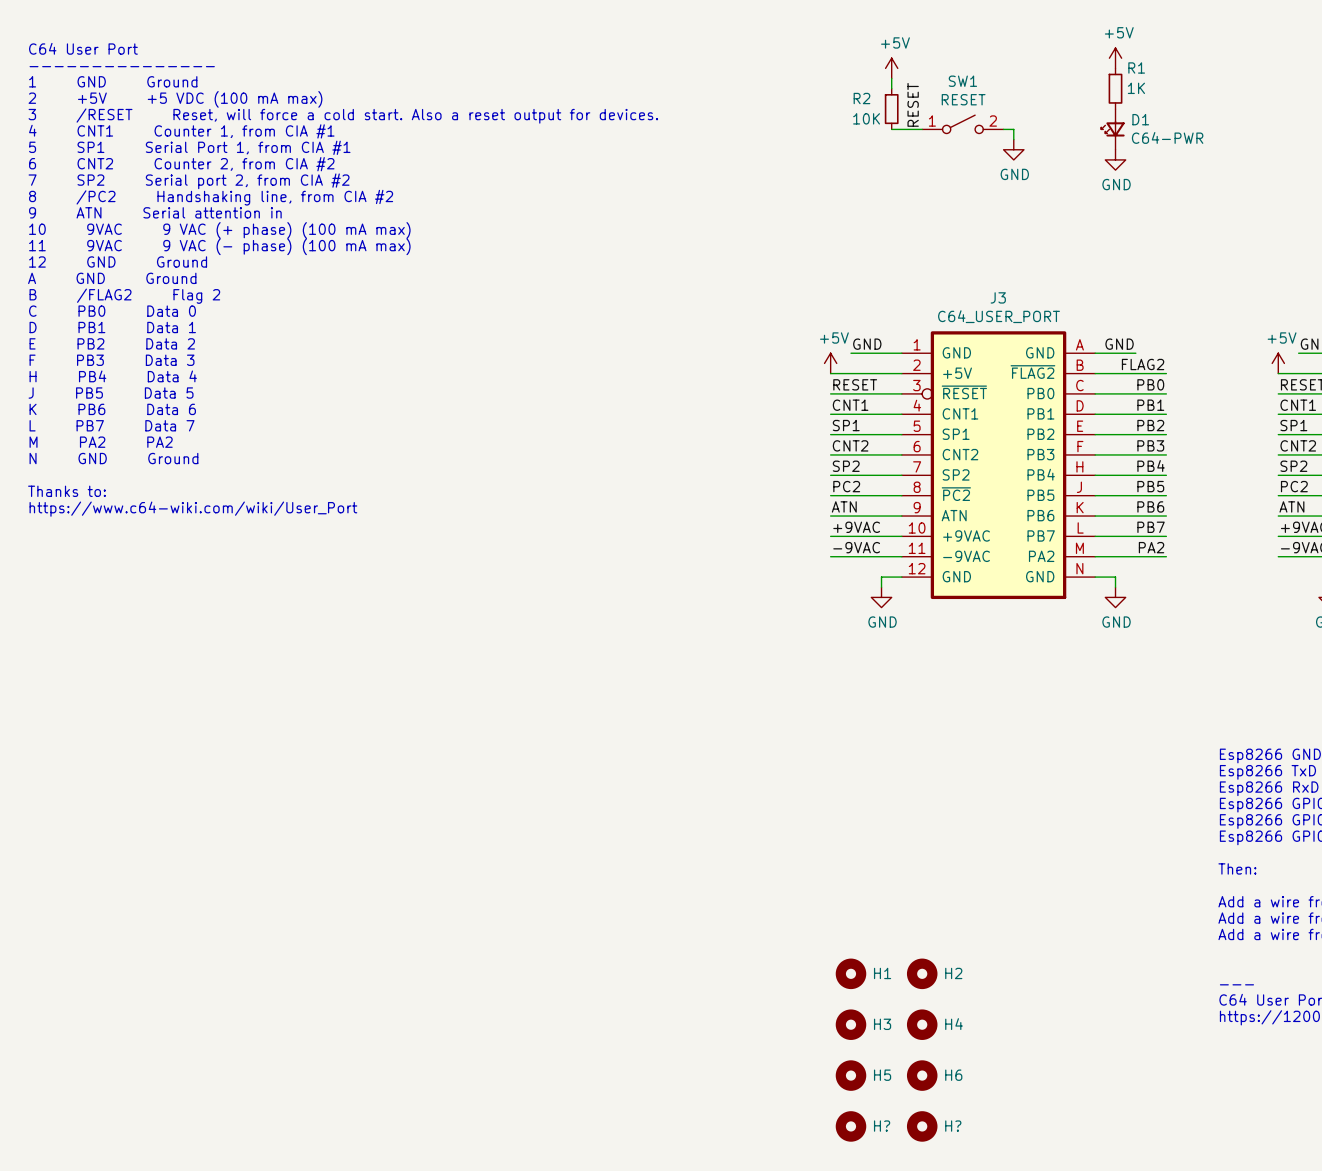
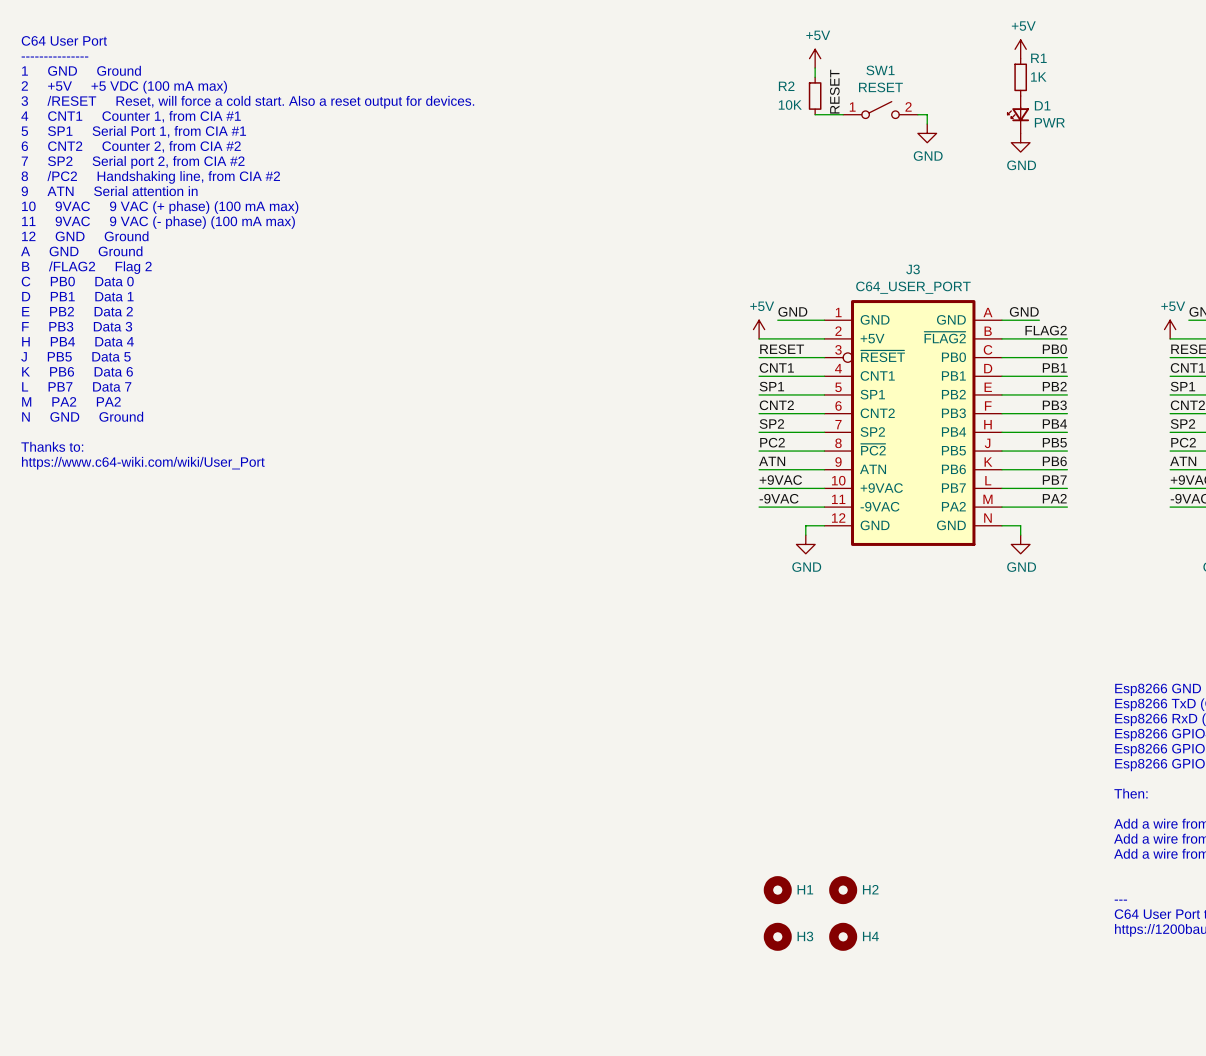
D1 value: C64-PWR (1167, 137) -> PWR (1049, 122)
H5: (850, 1075) -> none
H6: (922, 1075) -> none
H?: (850, 1126) -> none
H?: (922, 1126) -> none

